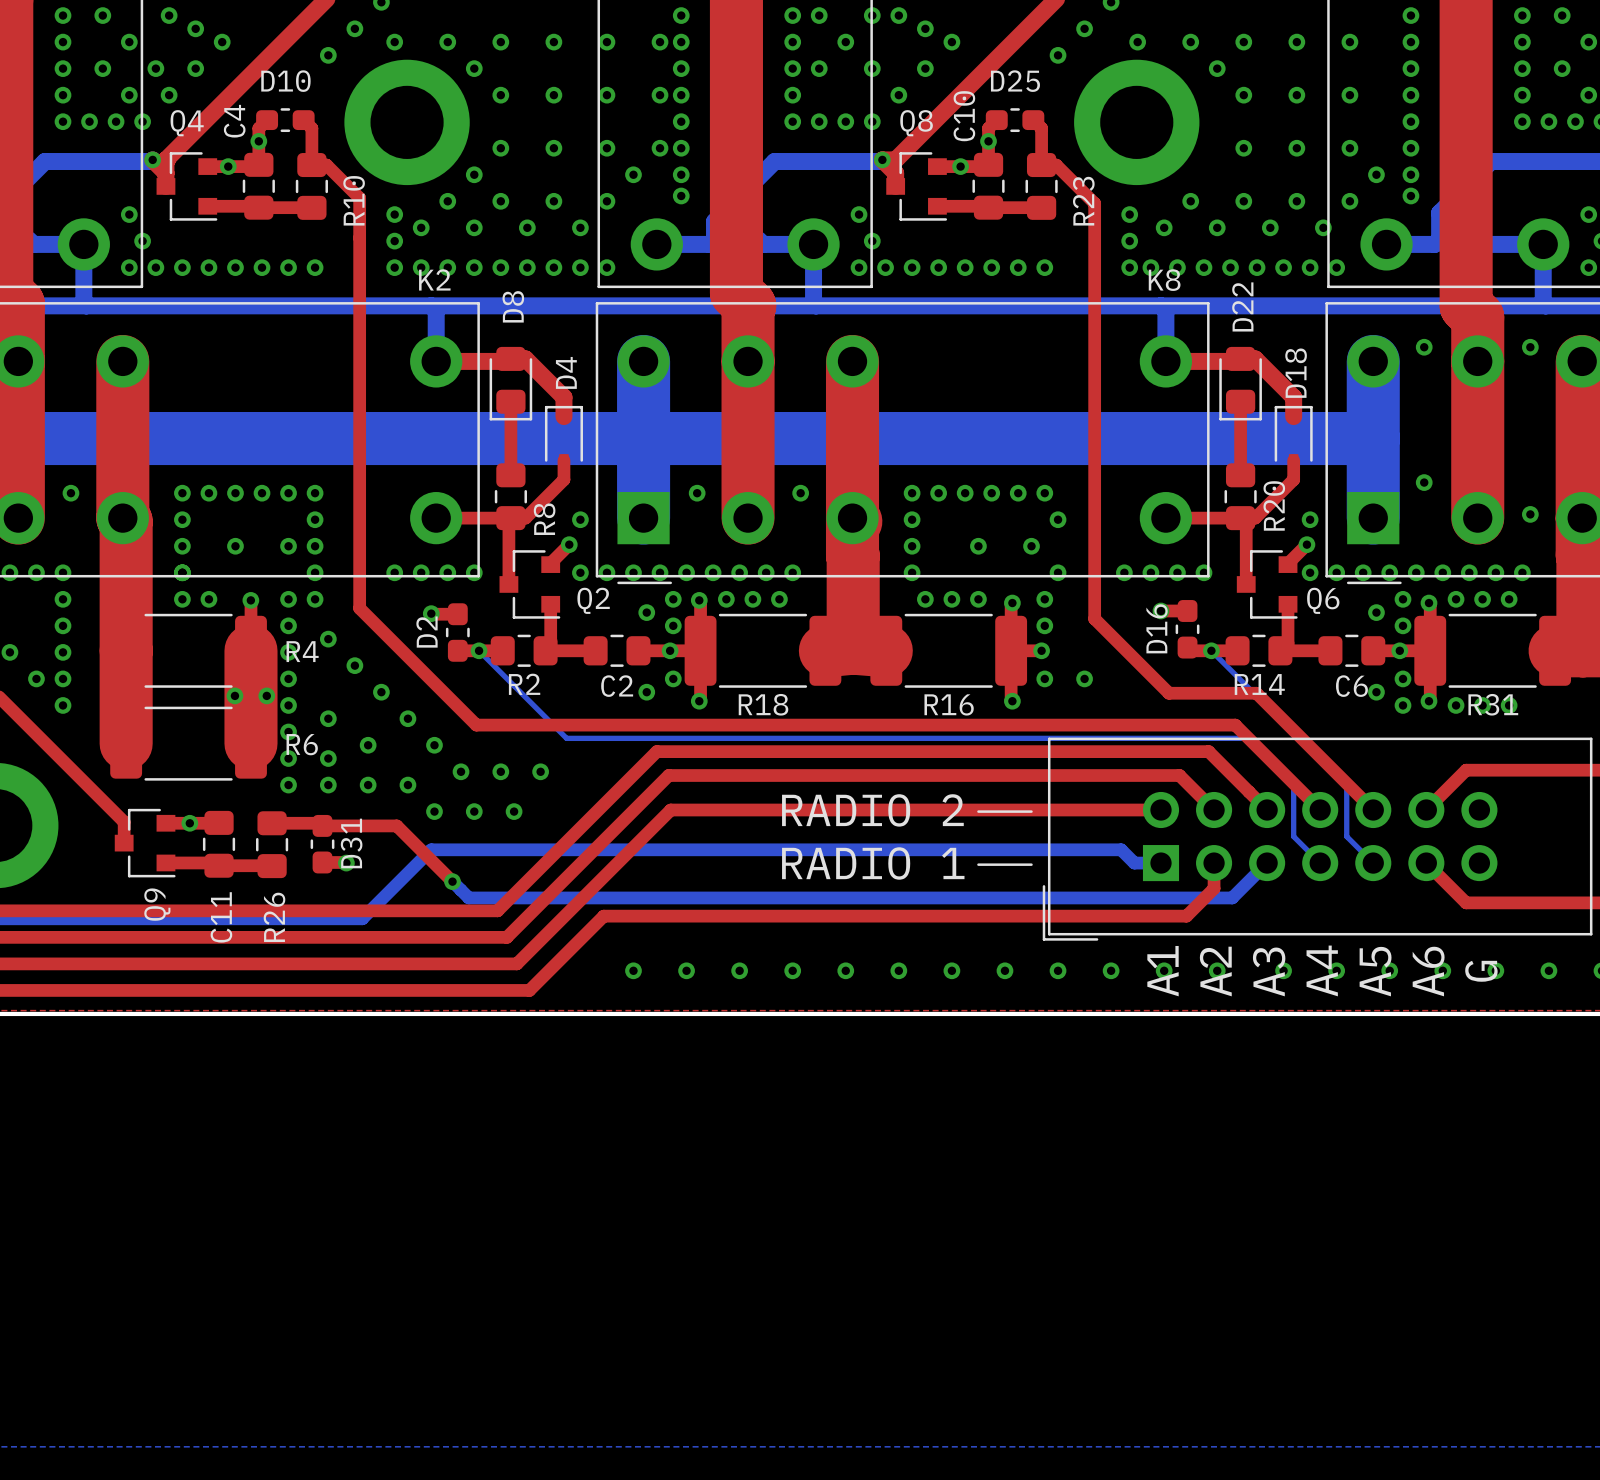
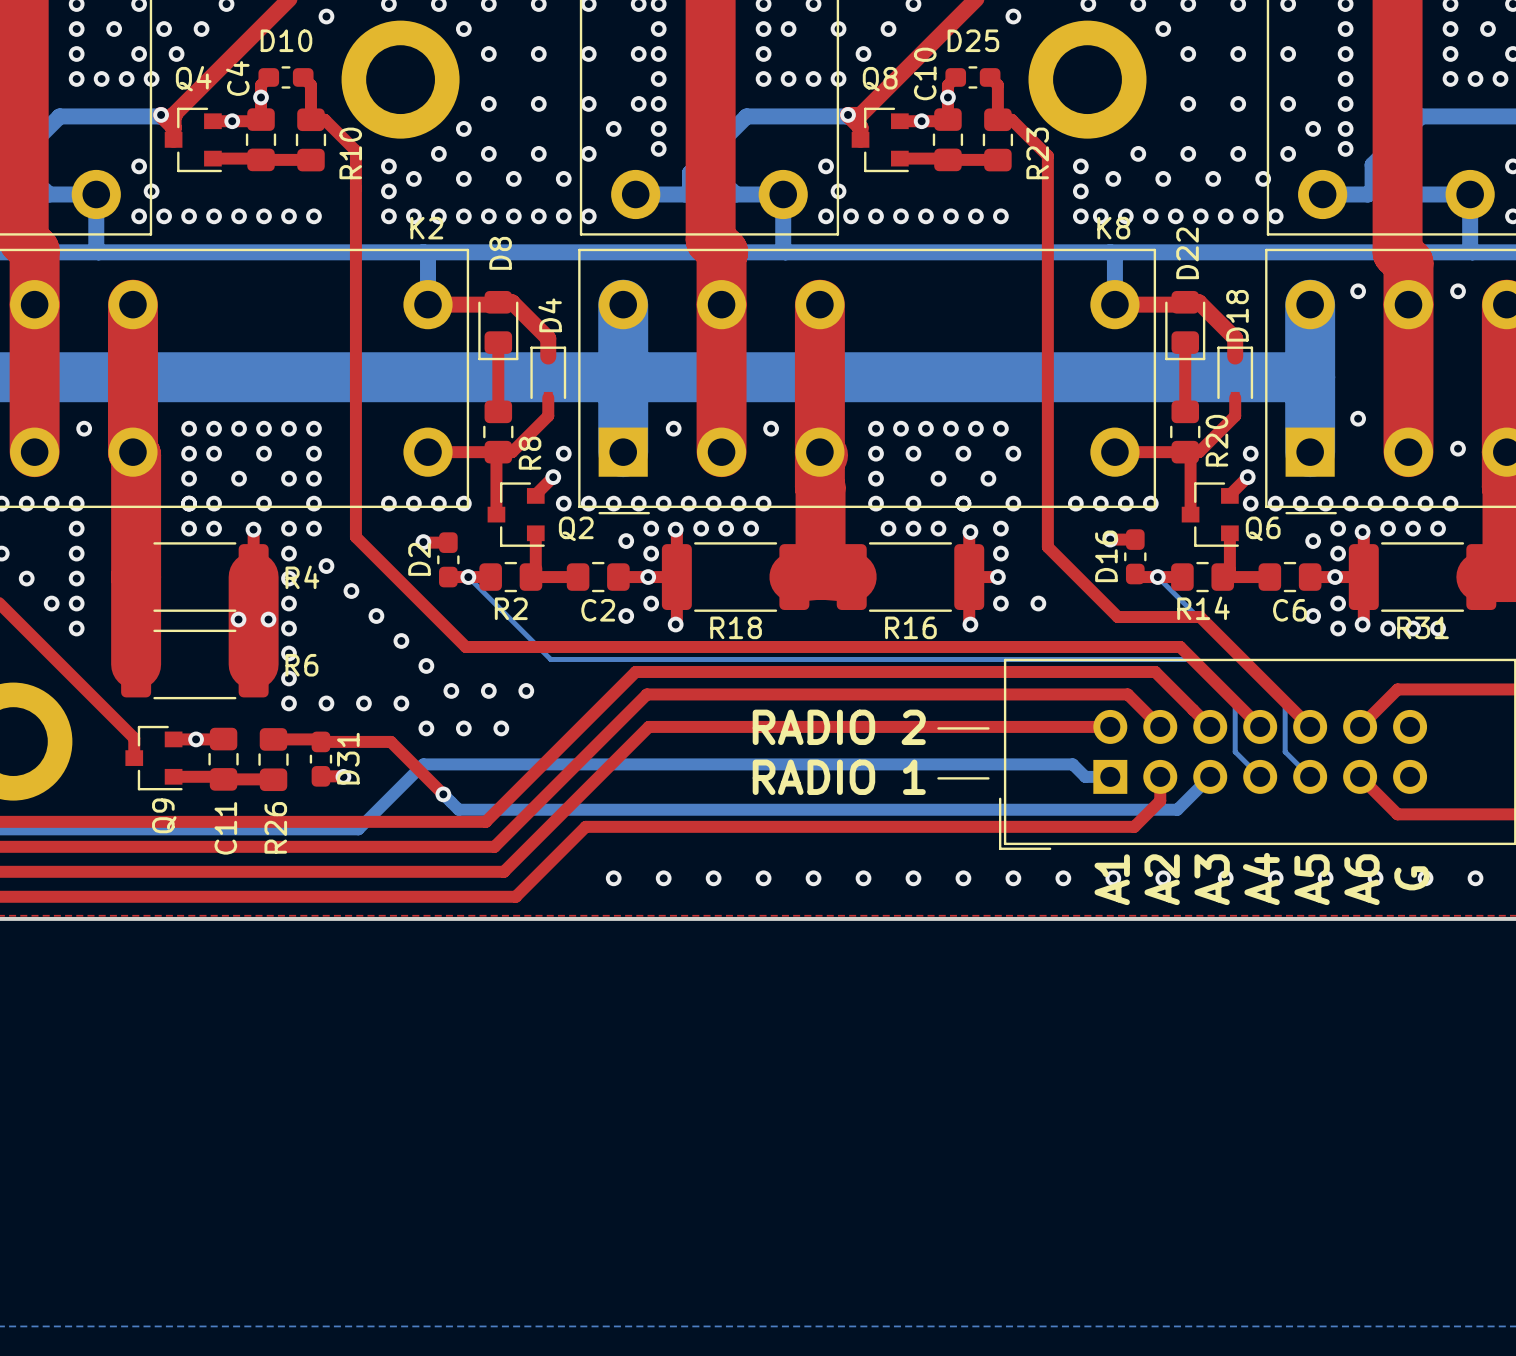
via: none -> (214, 453)
via: none -> (264, 453)
via: none -> (913, 453)
via: none -> (963, 453)
via: none -> (214, 503)
via: none -> (264, 503)
via: none -> (913, 503)
via: none -> (963, 503)
via: (328, 718) -> none
via: (368, 745) -> none
via: (328, 758) -> none

